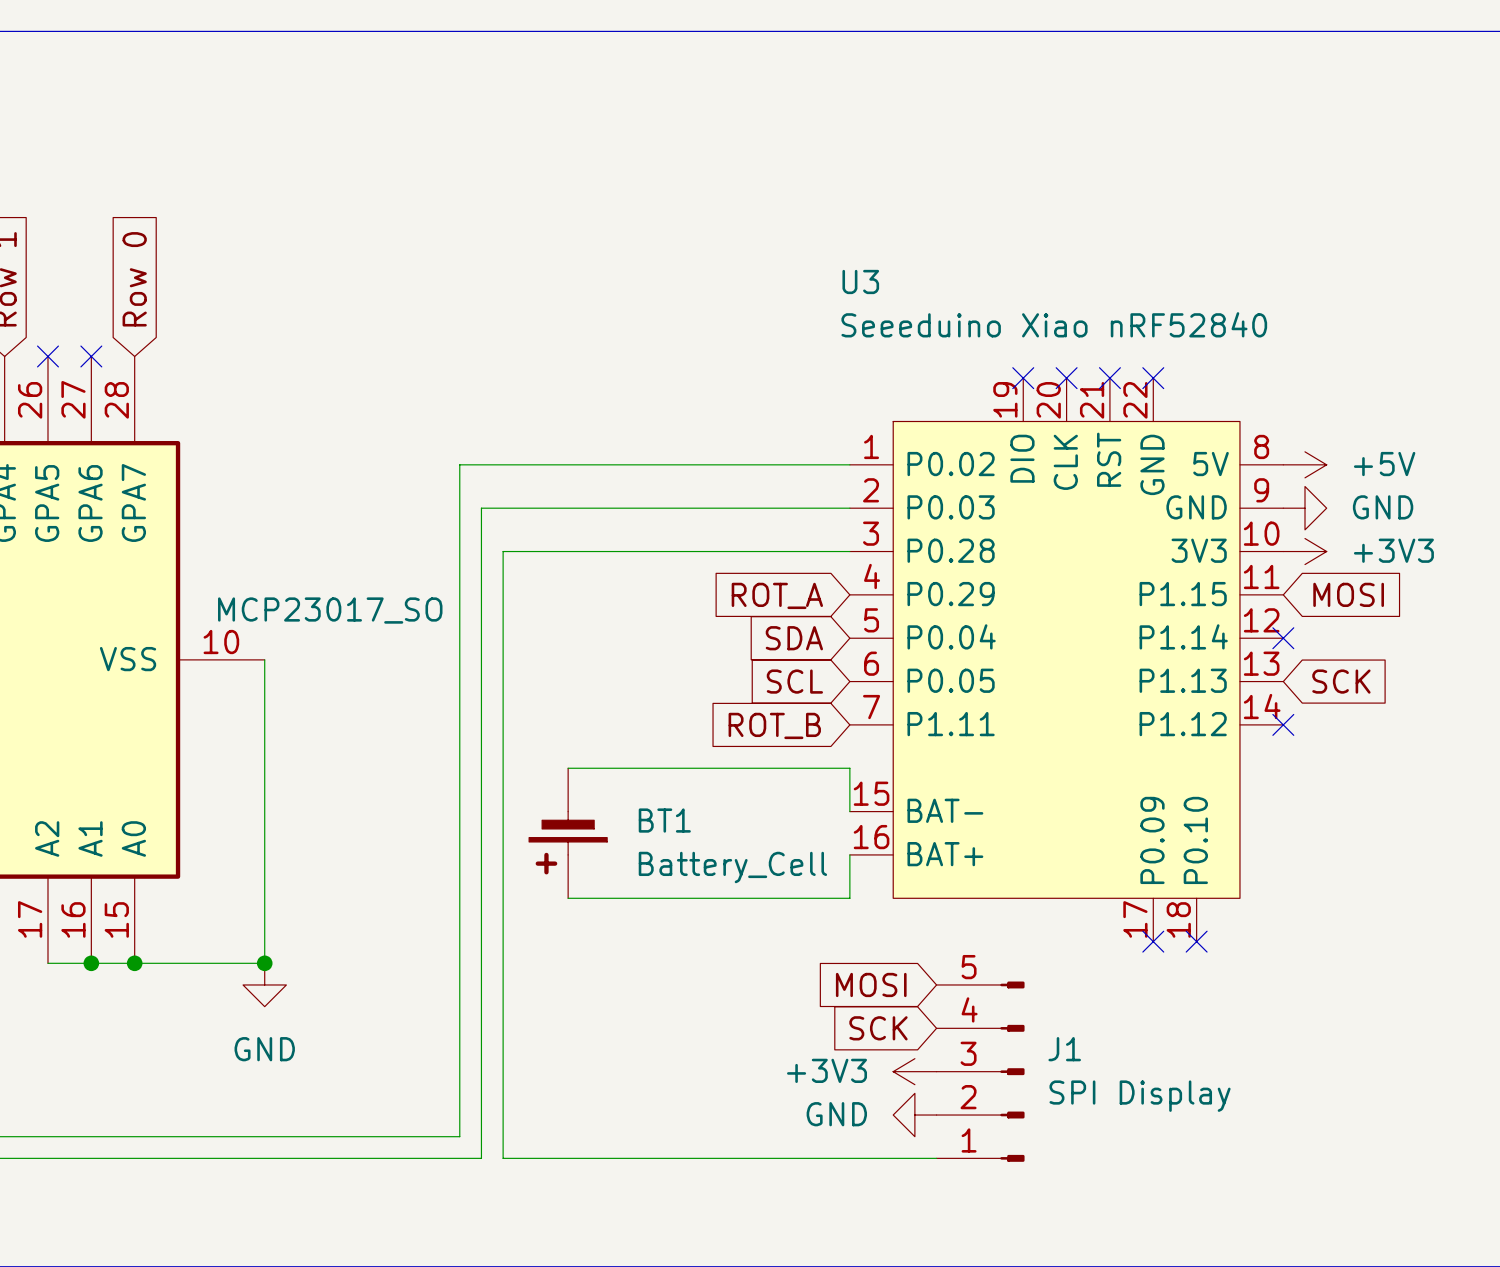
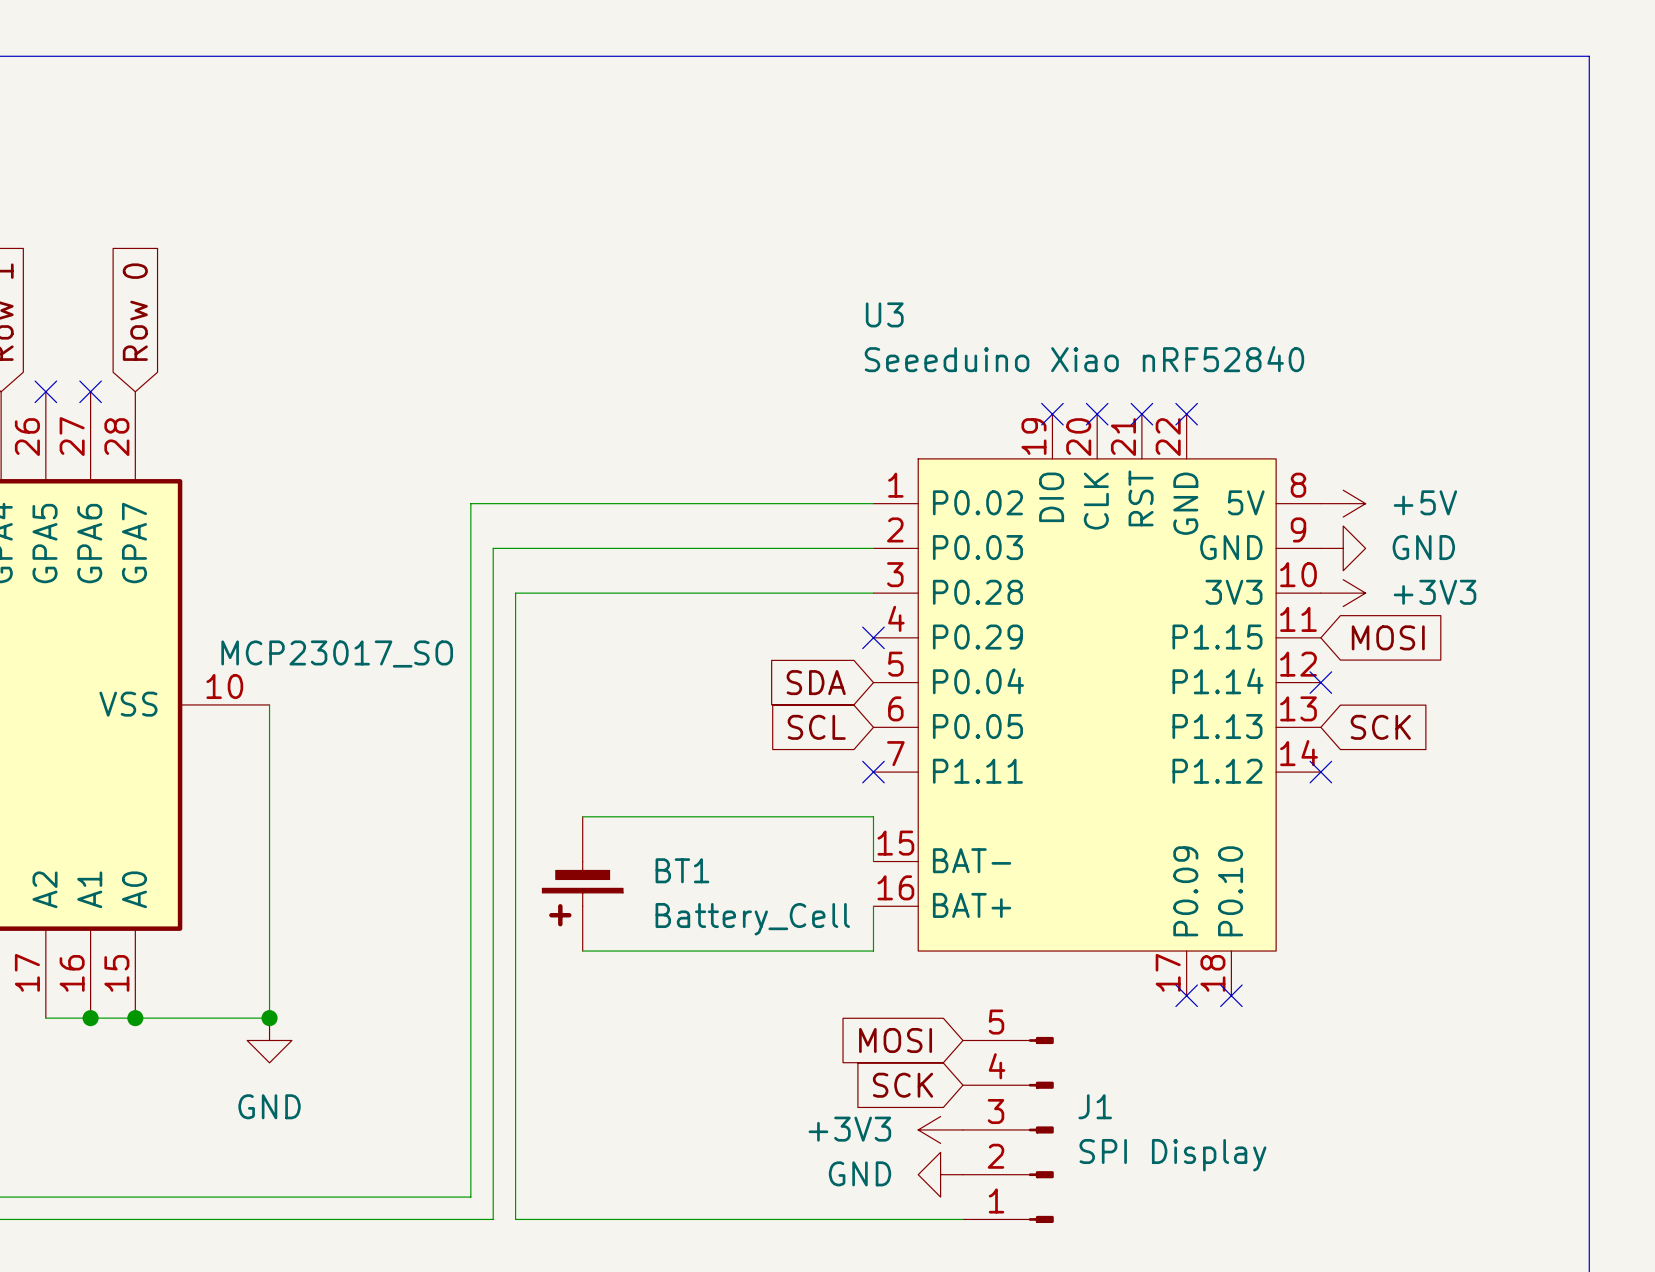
no-connect mark: none -> (873, 637)
global label: ROT_A (777, 595) -> none
no-connect mark: none -> (873, 772)
global label: ROT_B (774, 725) -> none

